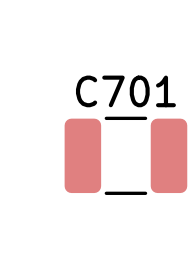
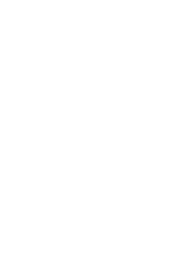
C701: (125, 155) -> none

